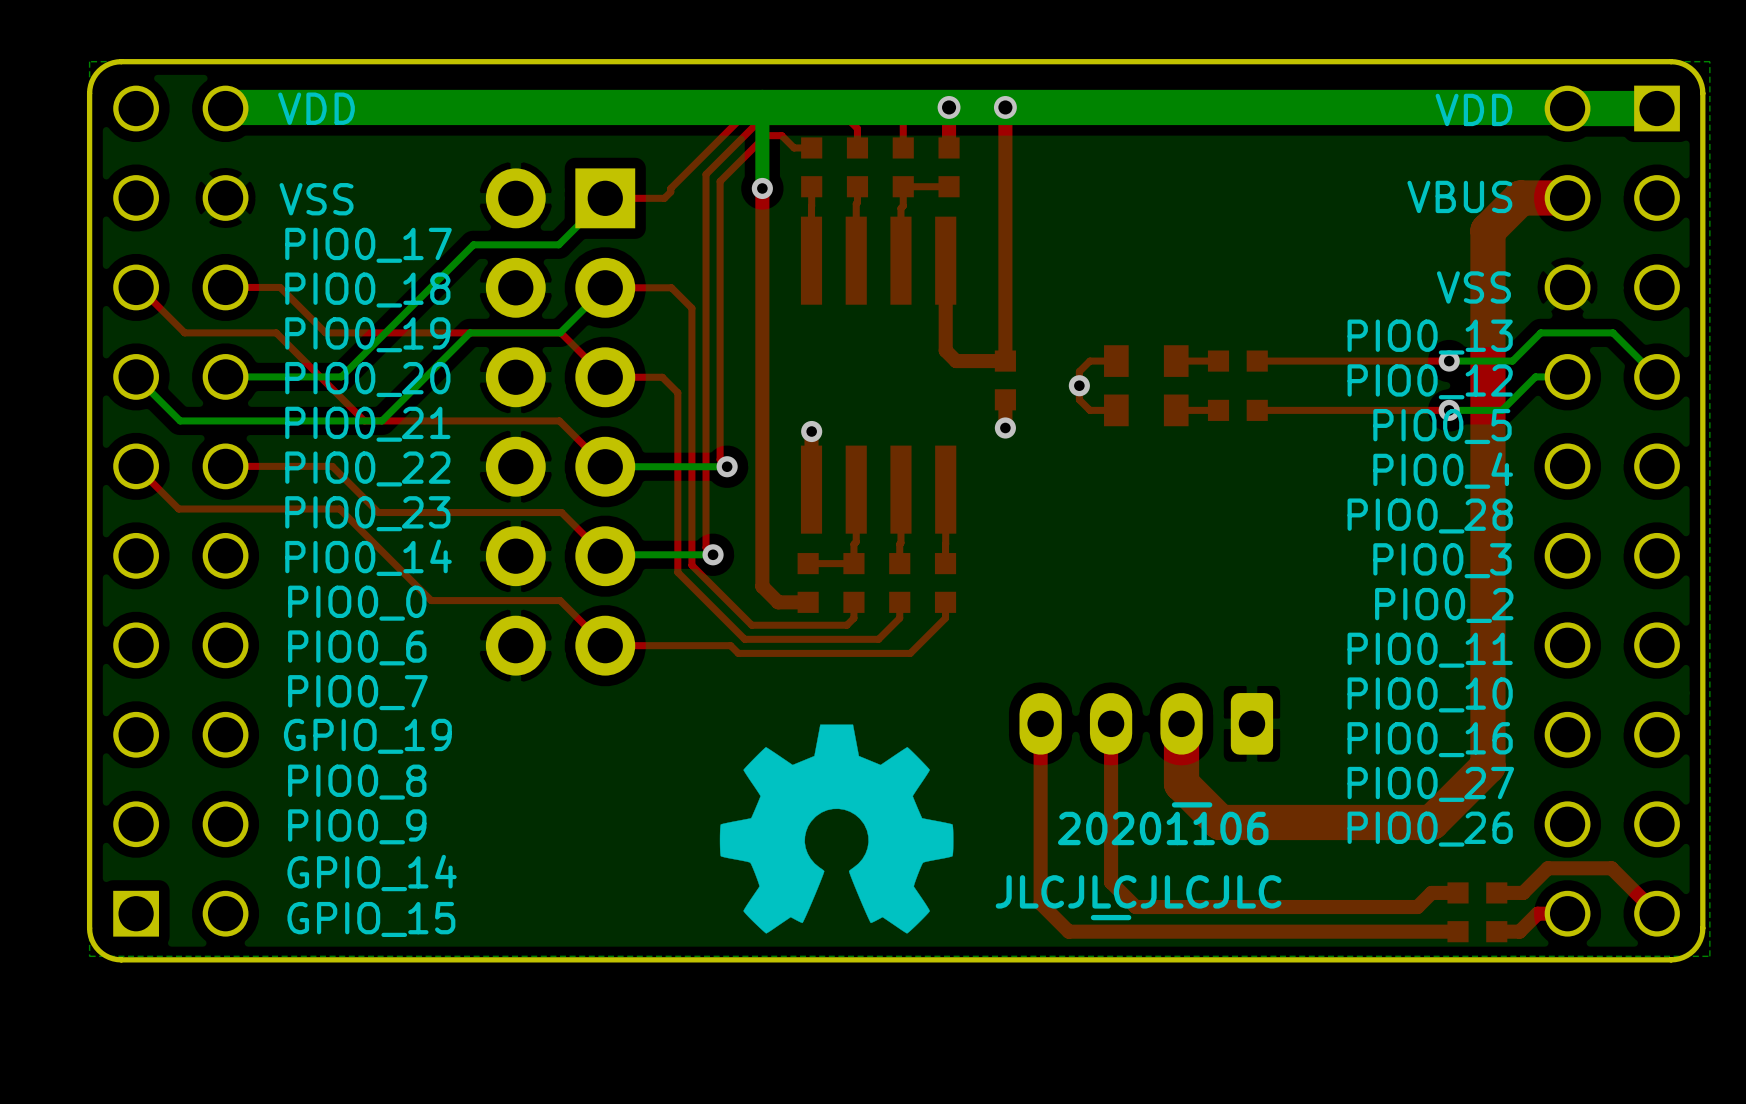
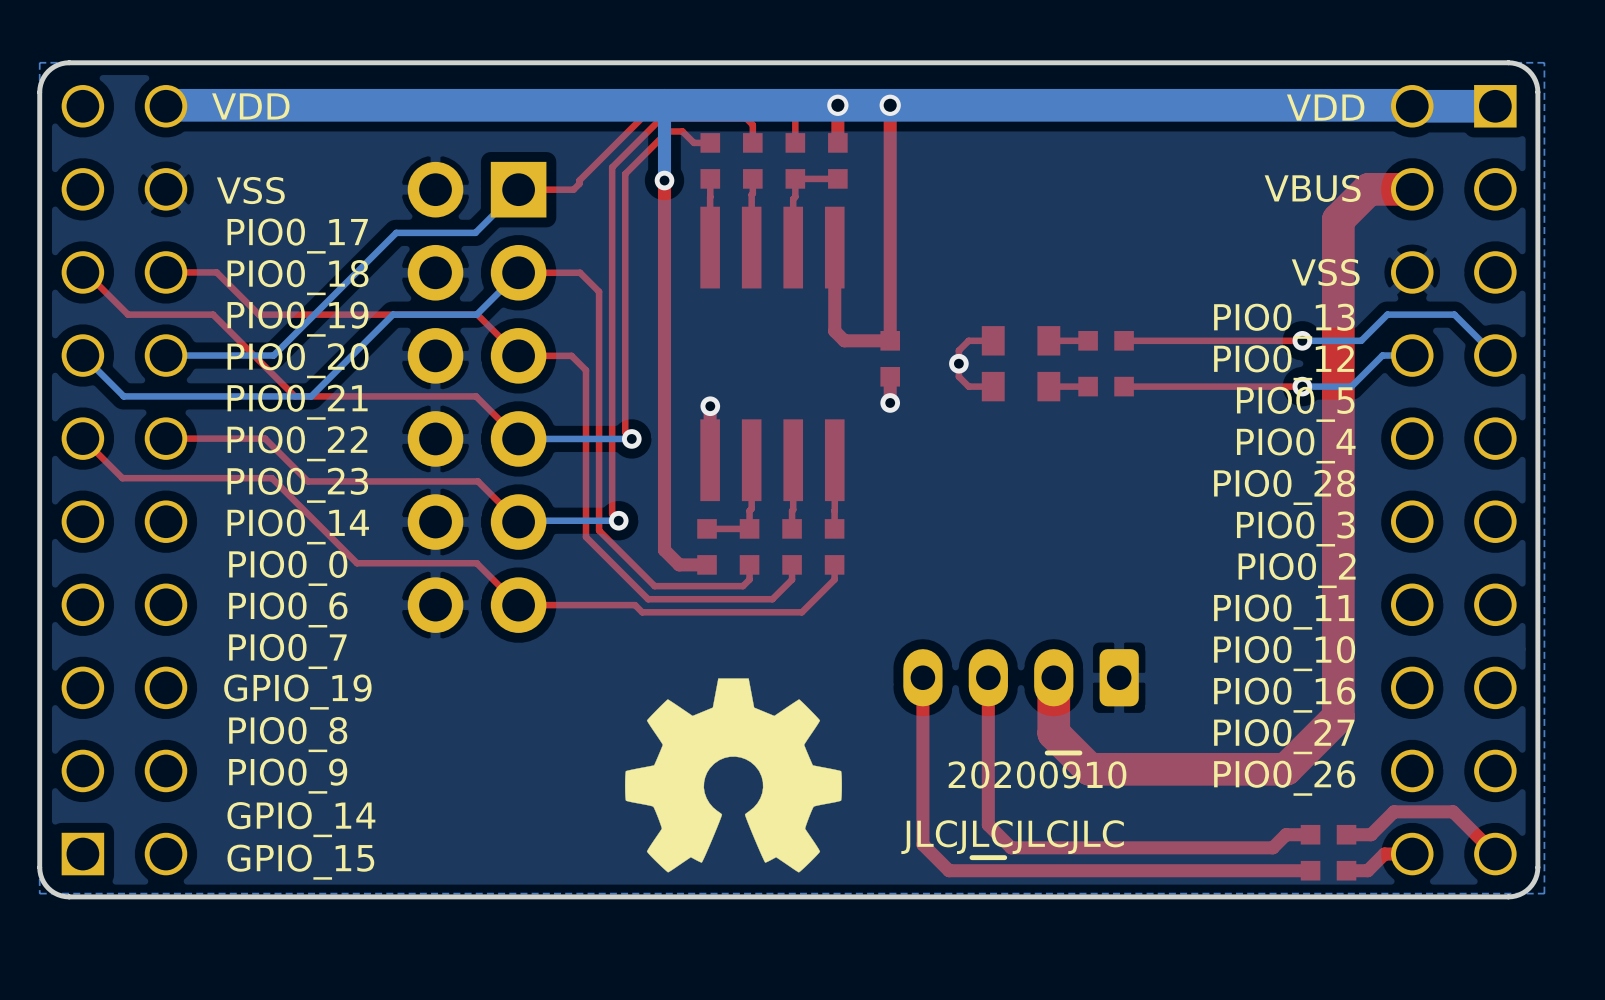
drawing shape: [1057, 802, 1269, 846] -> [948, 750, 1127, 789]

